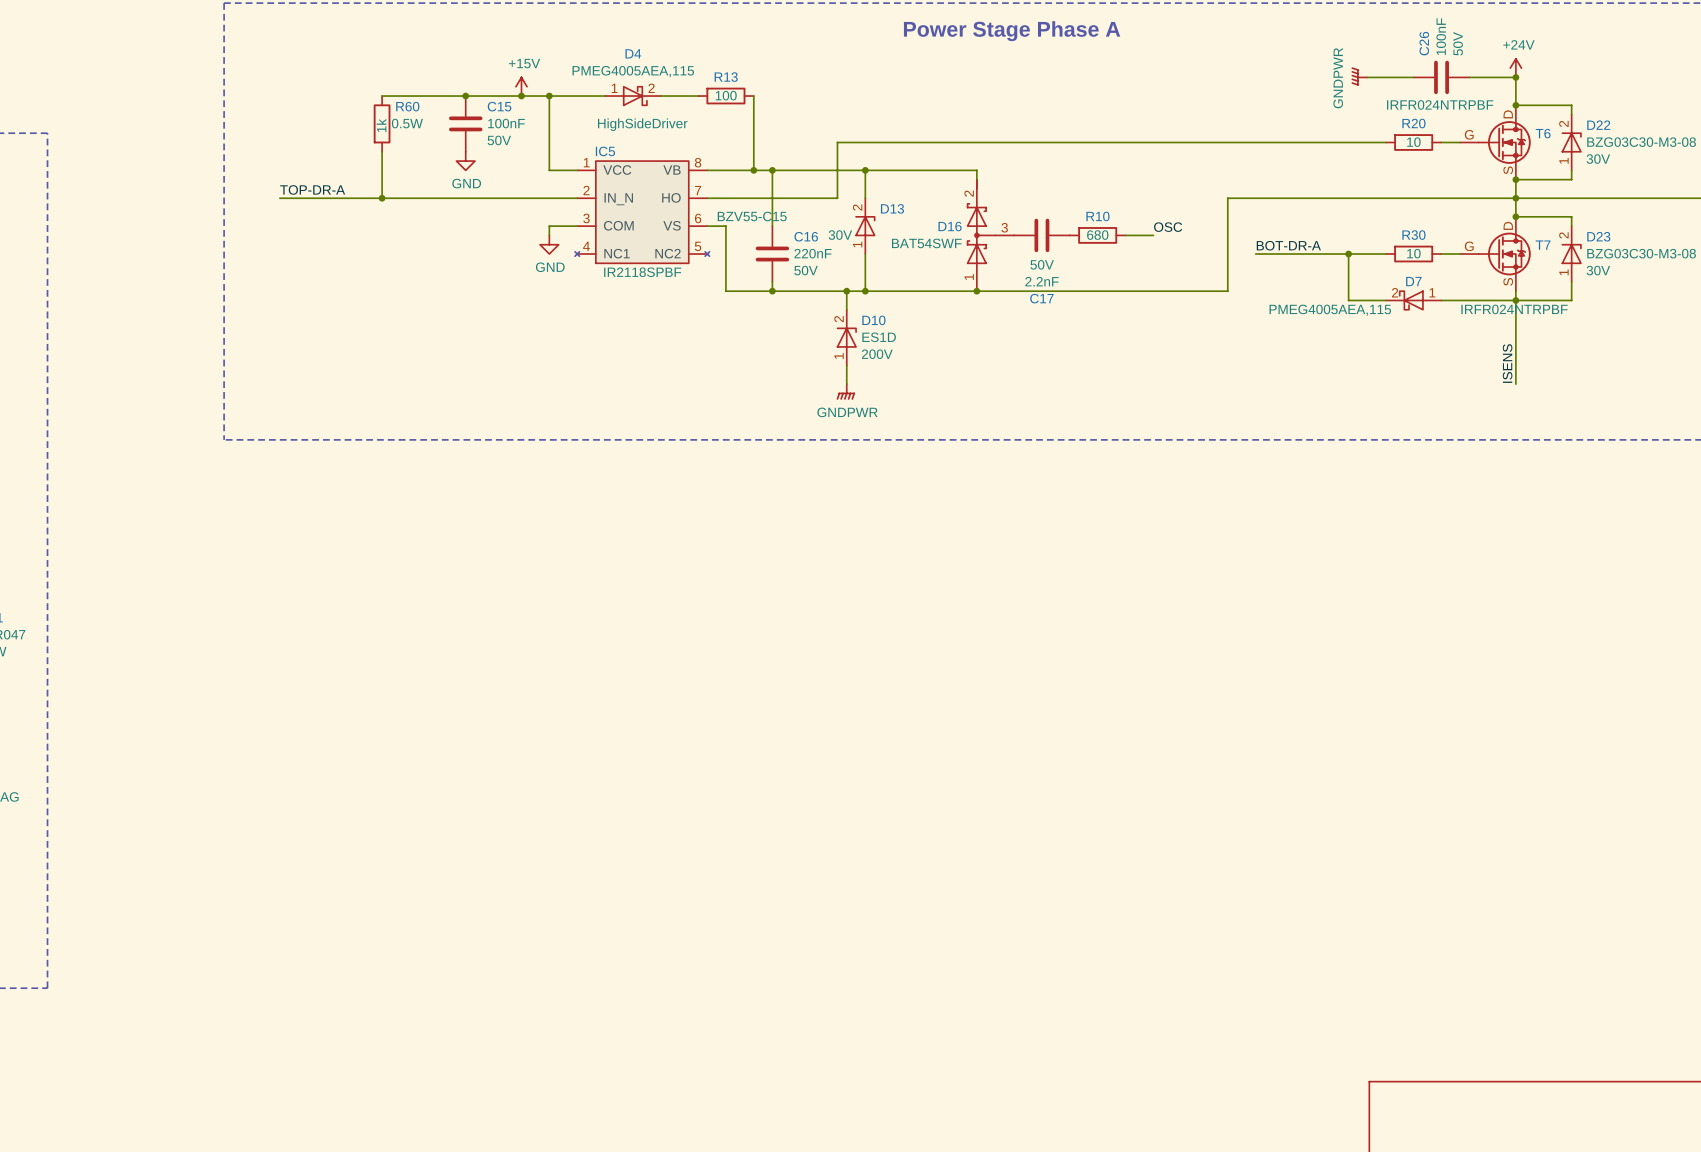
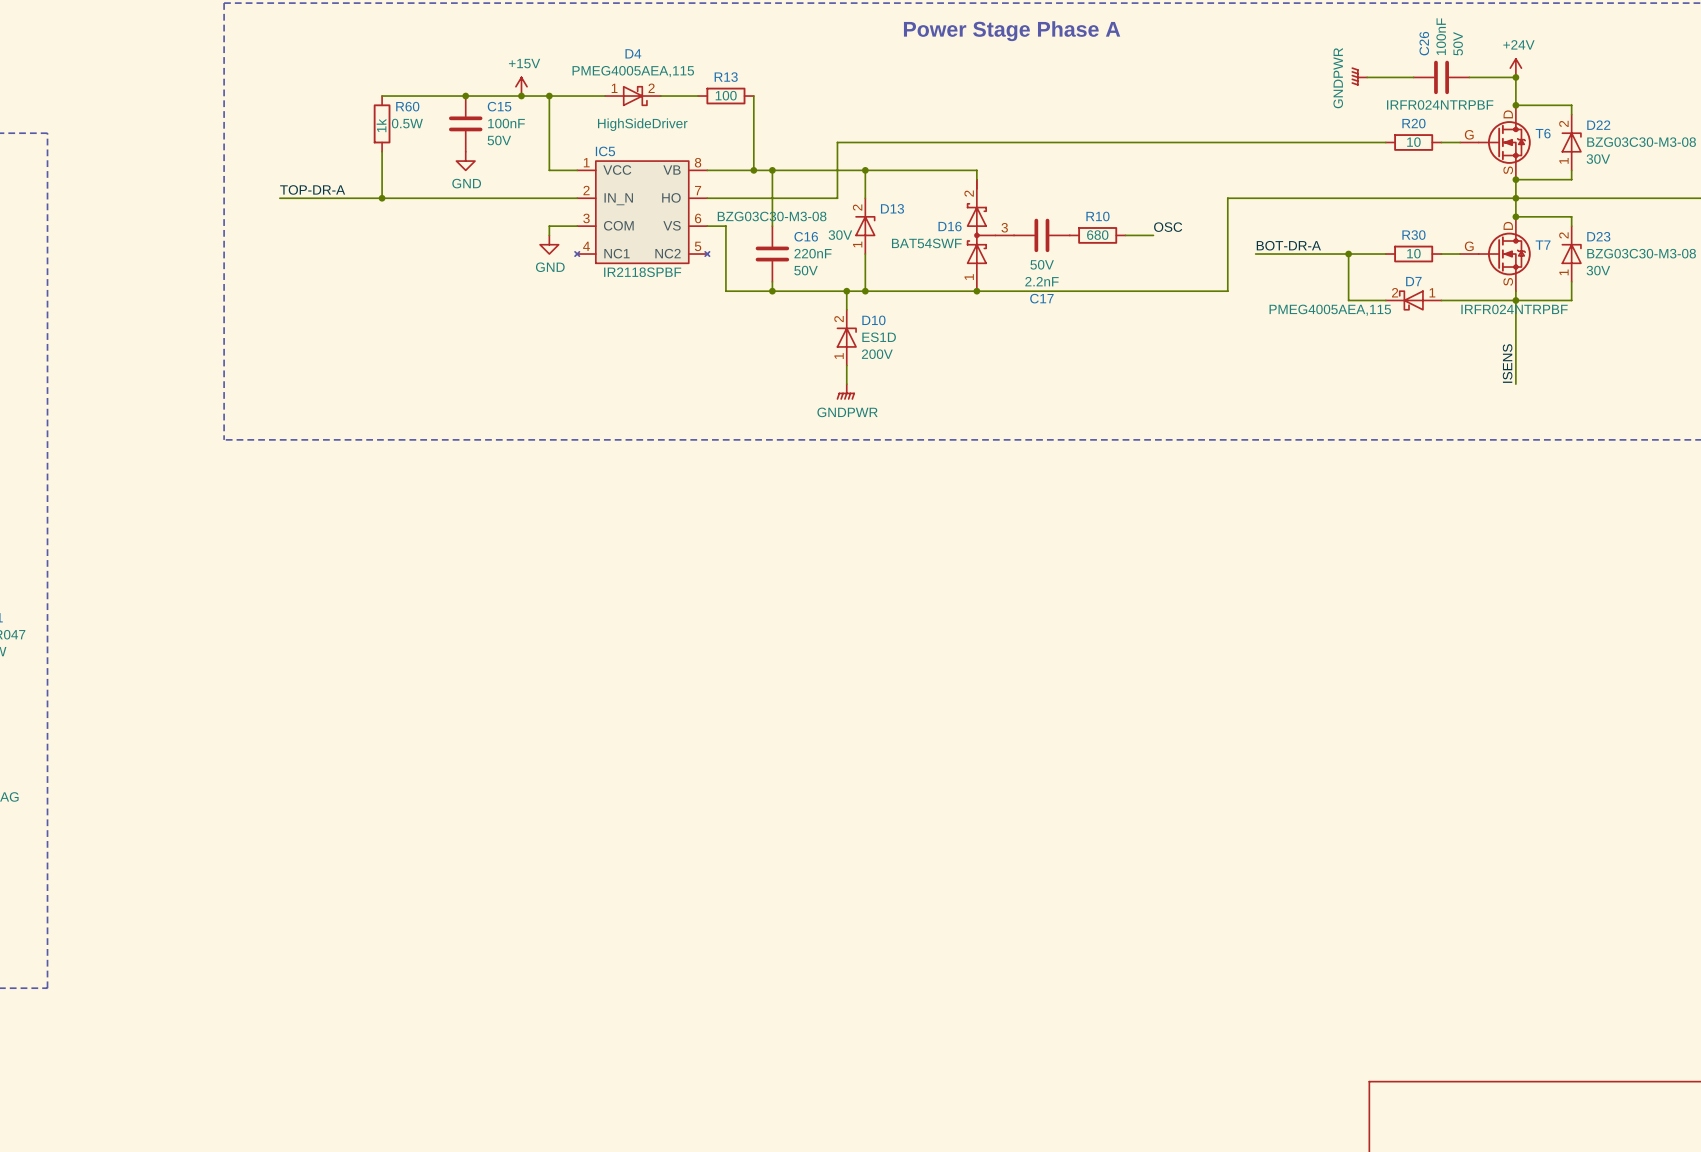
D13 text: BZV55-C15 (752, 216) -> BZG03C30-M3-08 (772, 216)

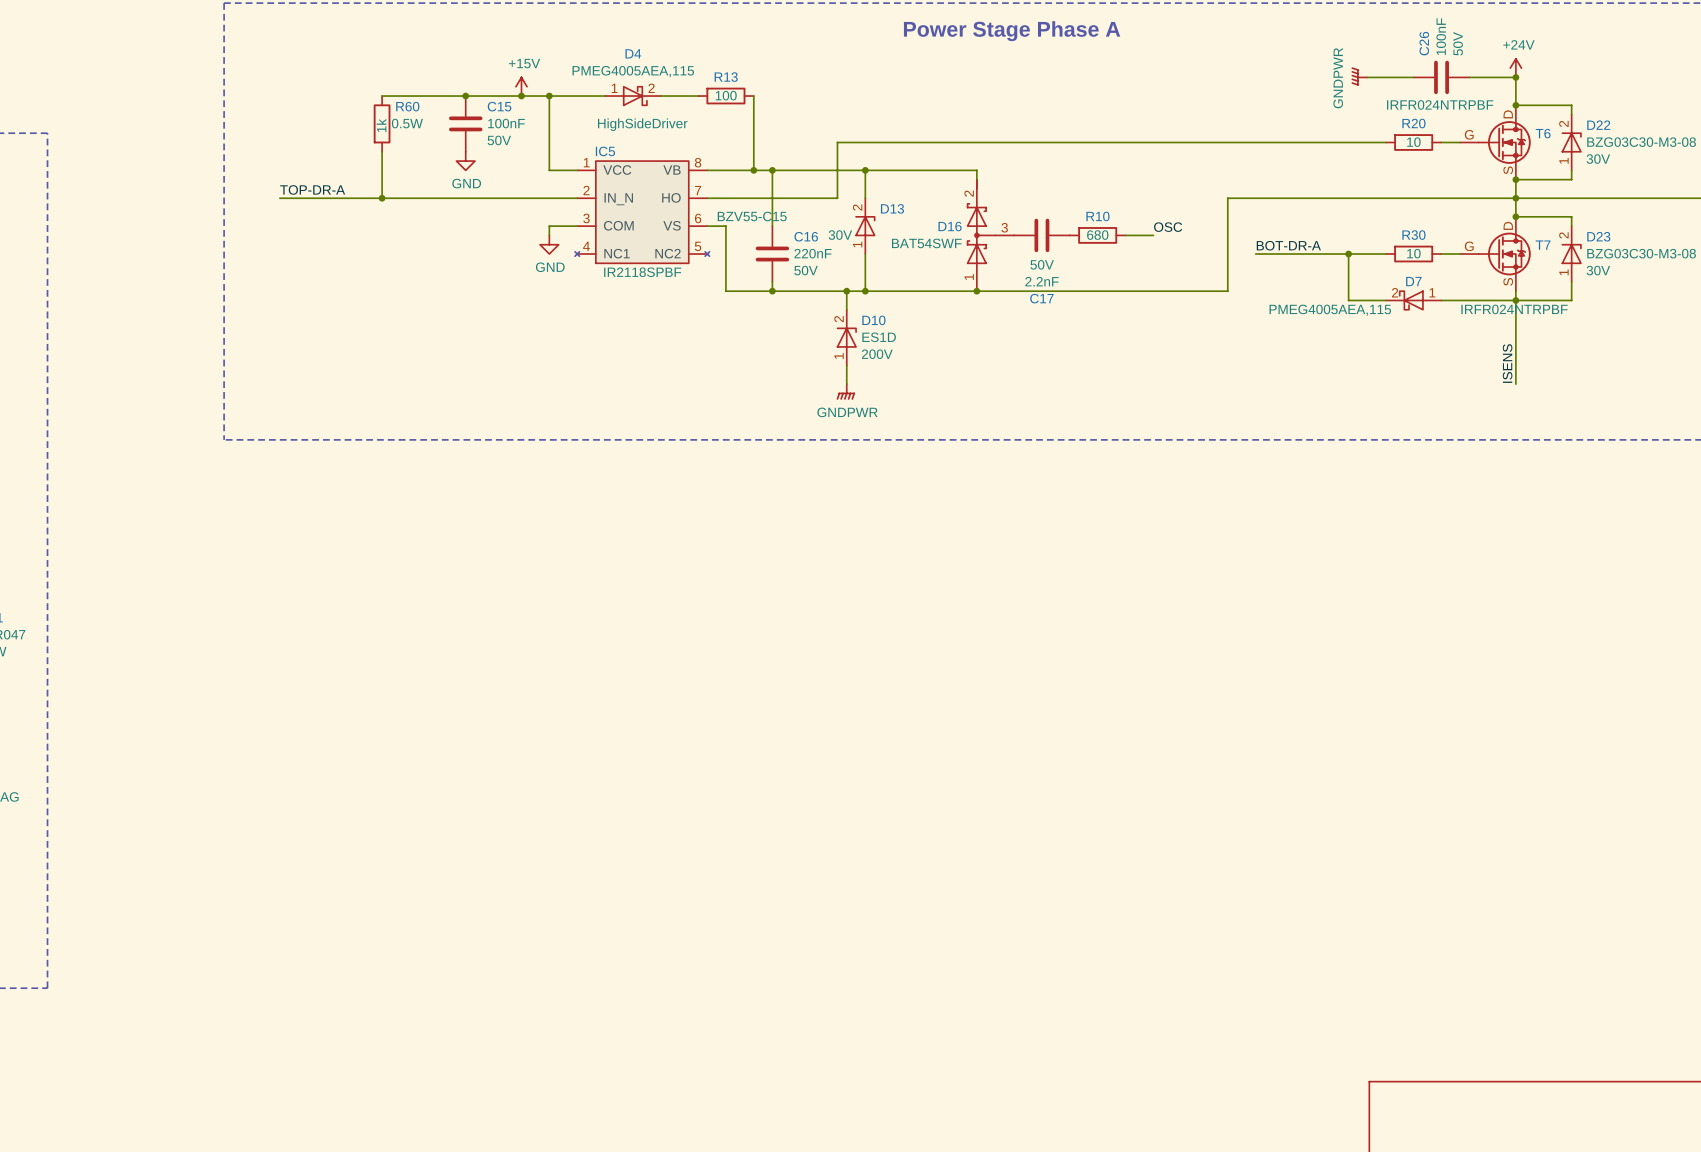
D13 text: BZG03C30-M3-08 (772, 216) -> BZV55-C15 (752, 216)

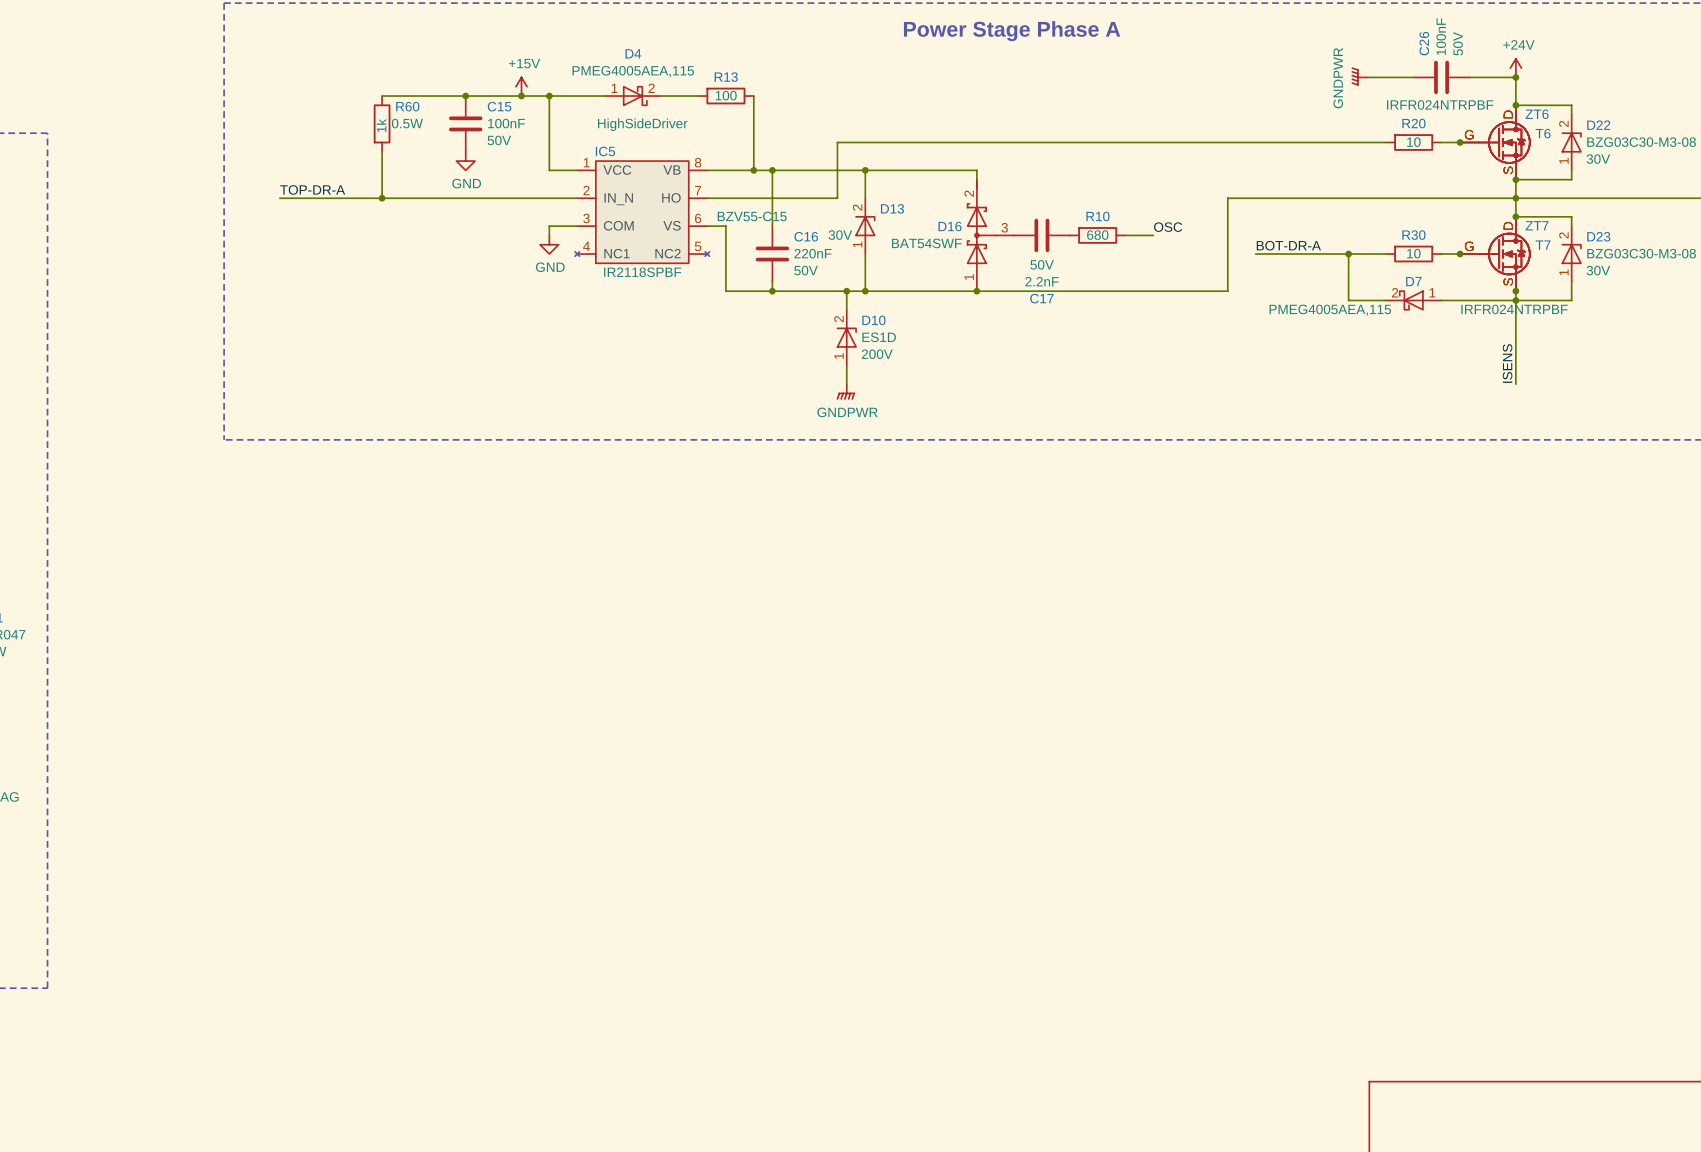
junction: none -> (1460, 142)
ZT6: none -> (1495, 142)
junction: none -> (1460, 254)
ZT7: none -> (1495, 254)
junction: none -> (1515, 291)

